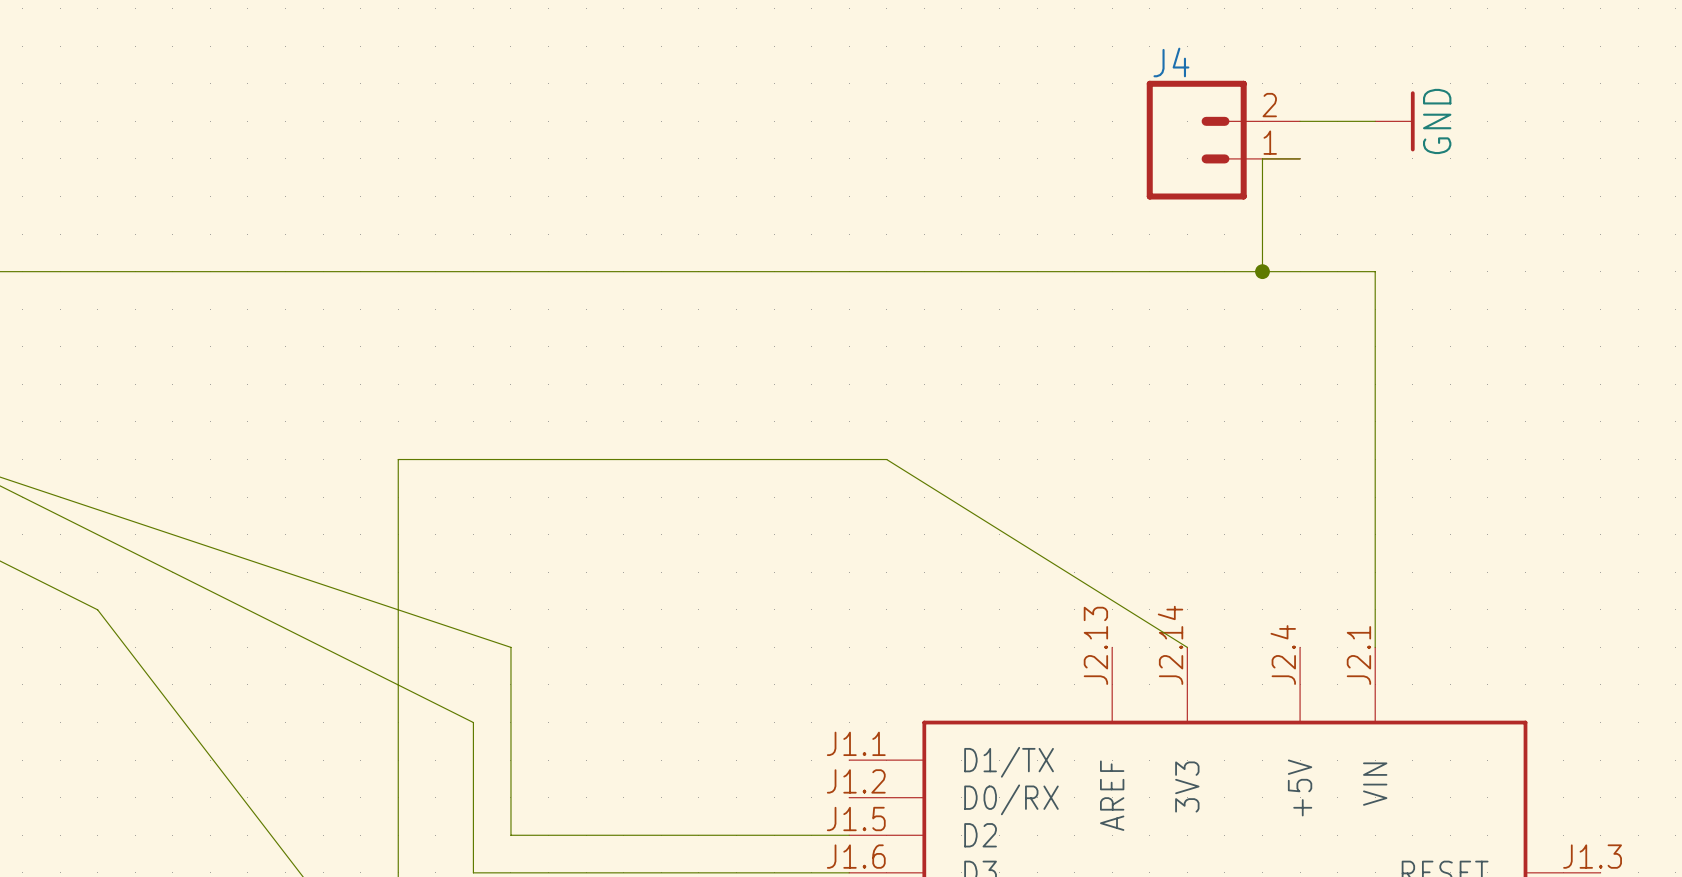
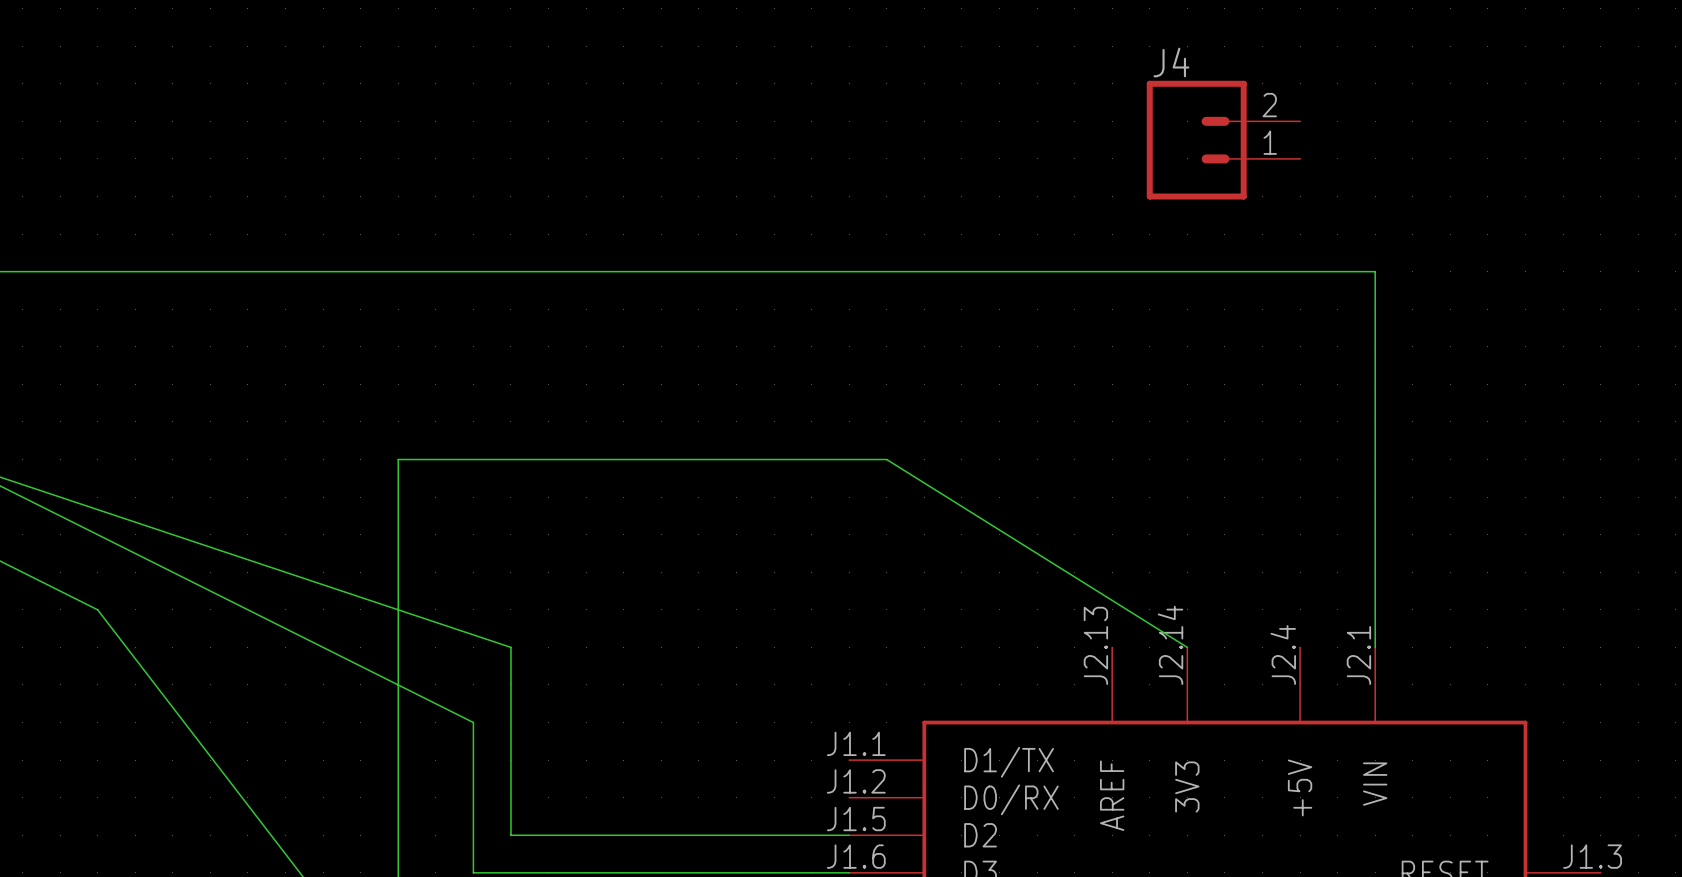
wire: (1300, 121) (1375, 121) -> none
power symbol: GND (1394, 121) -> none
wire: (1300, 158) (1262, 158) (1262, 271) -> none
junction: (1262, 271) -> none

